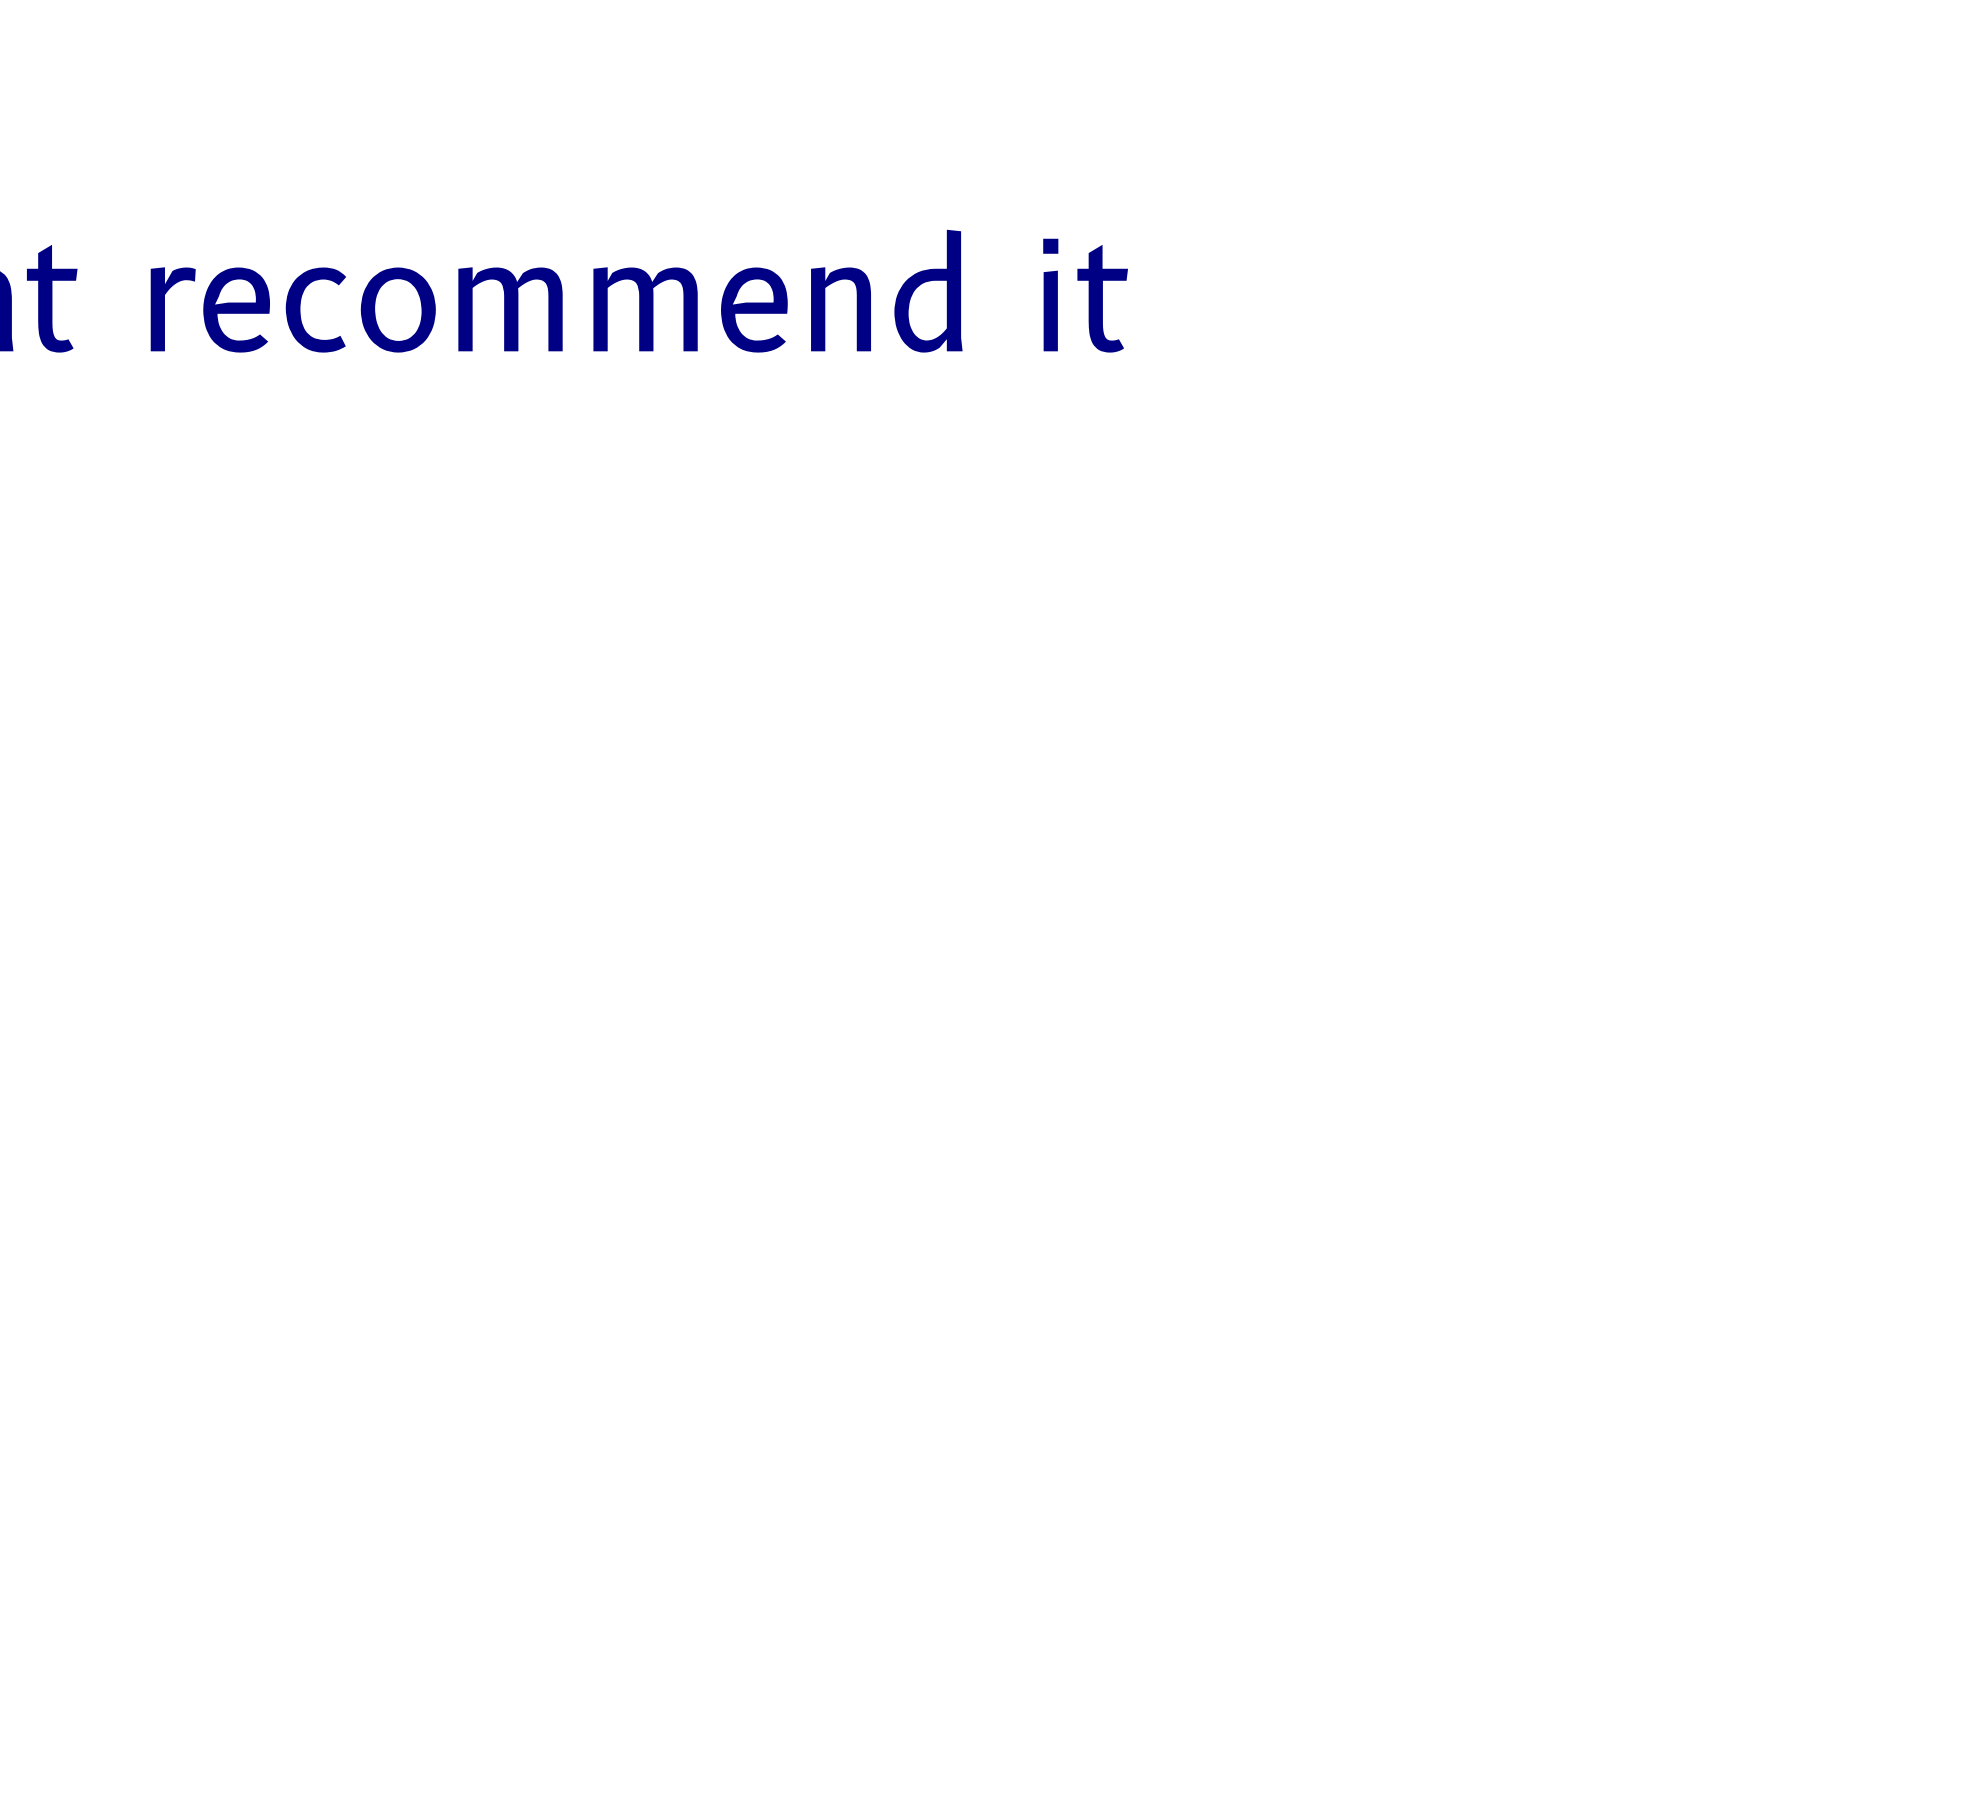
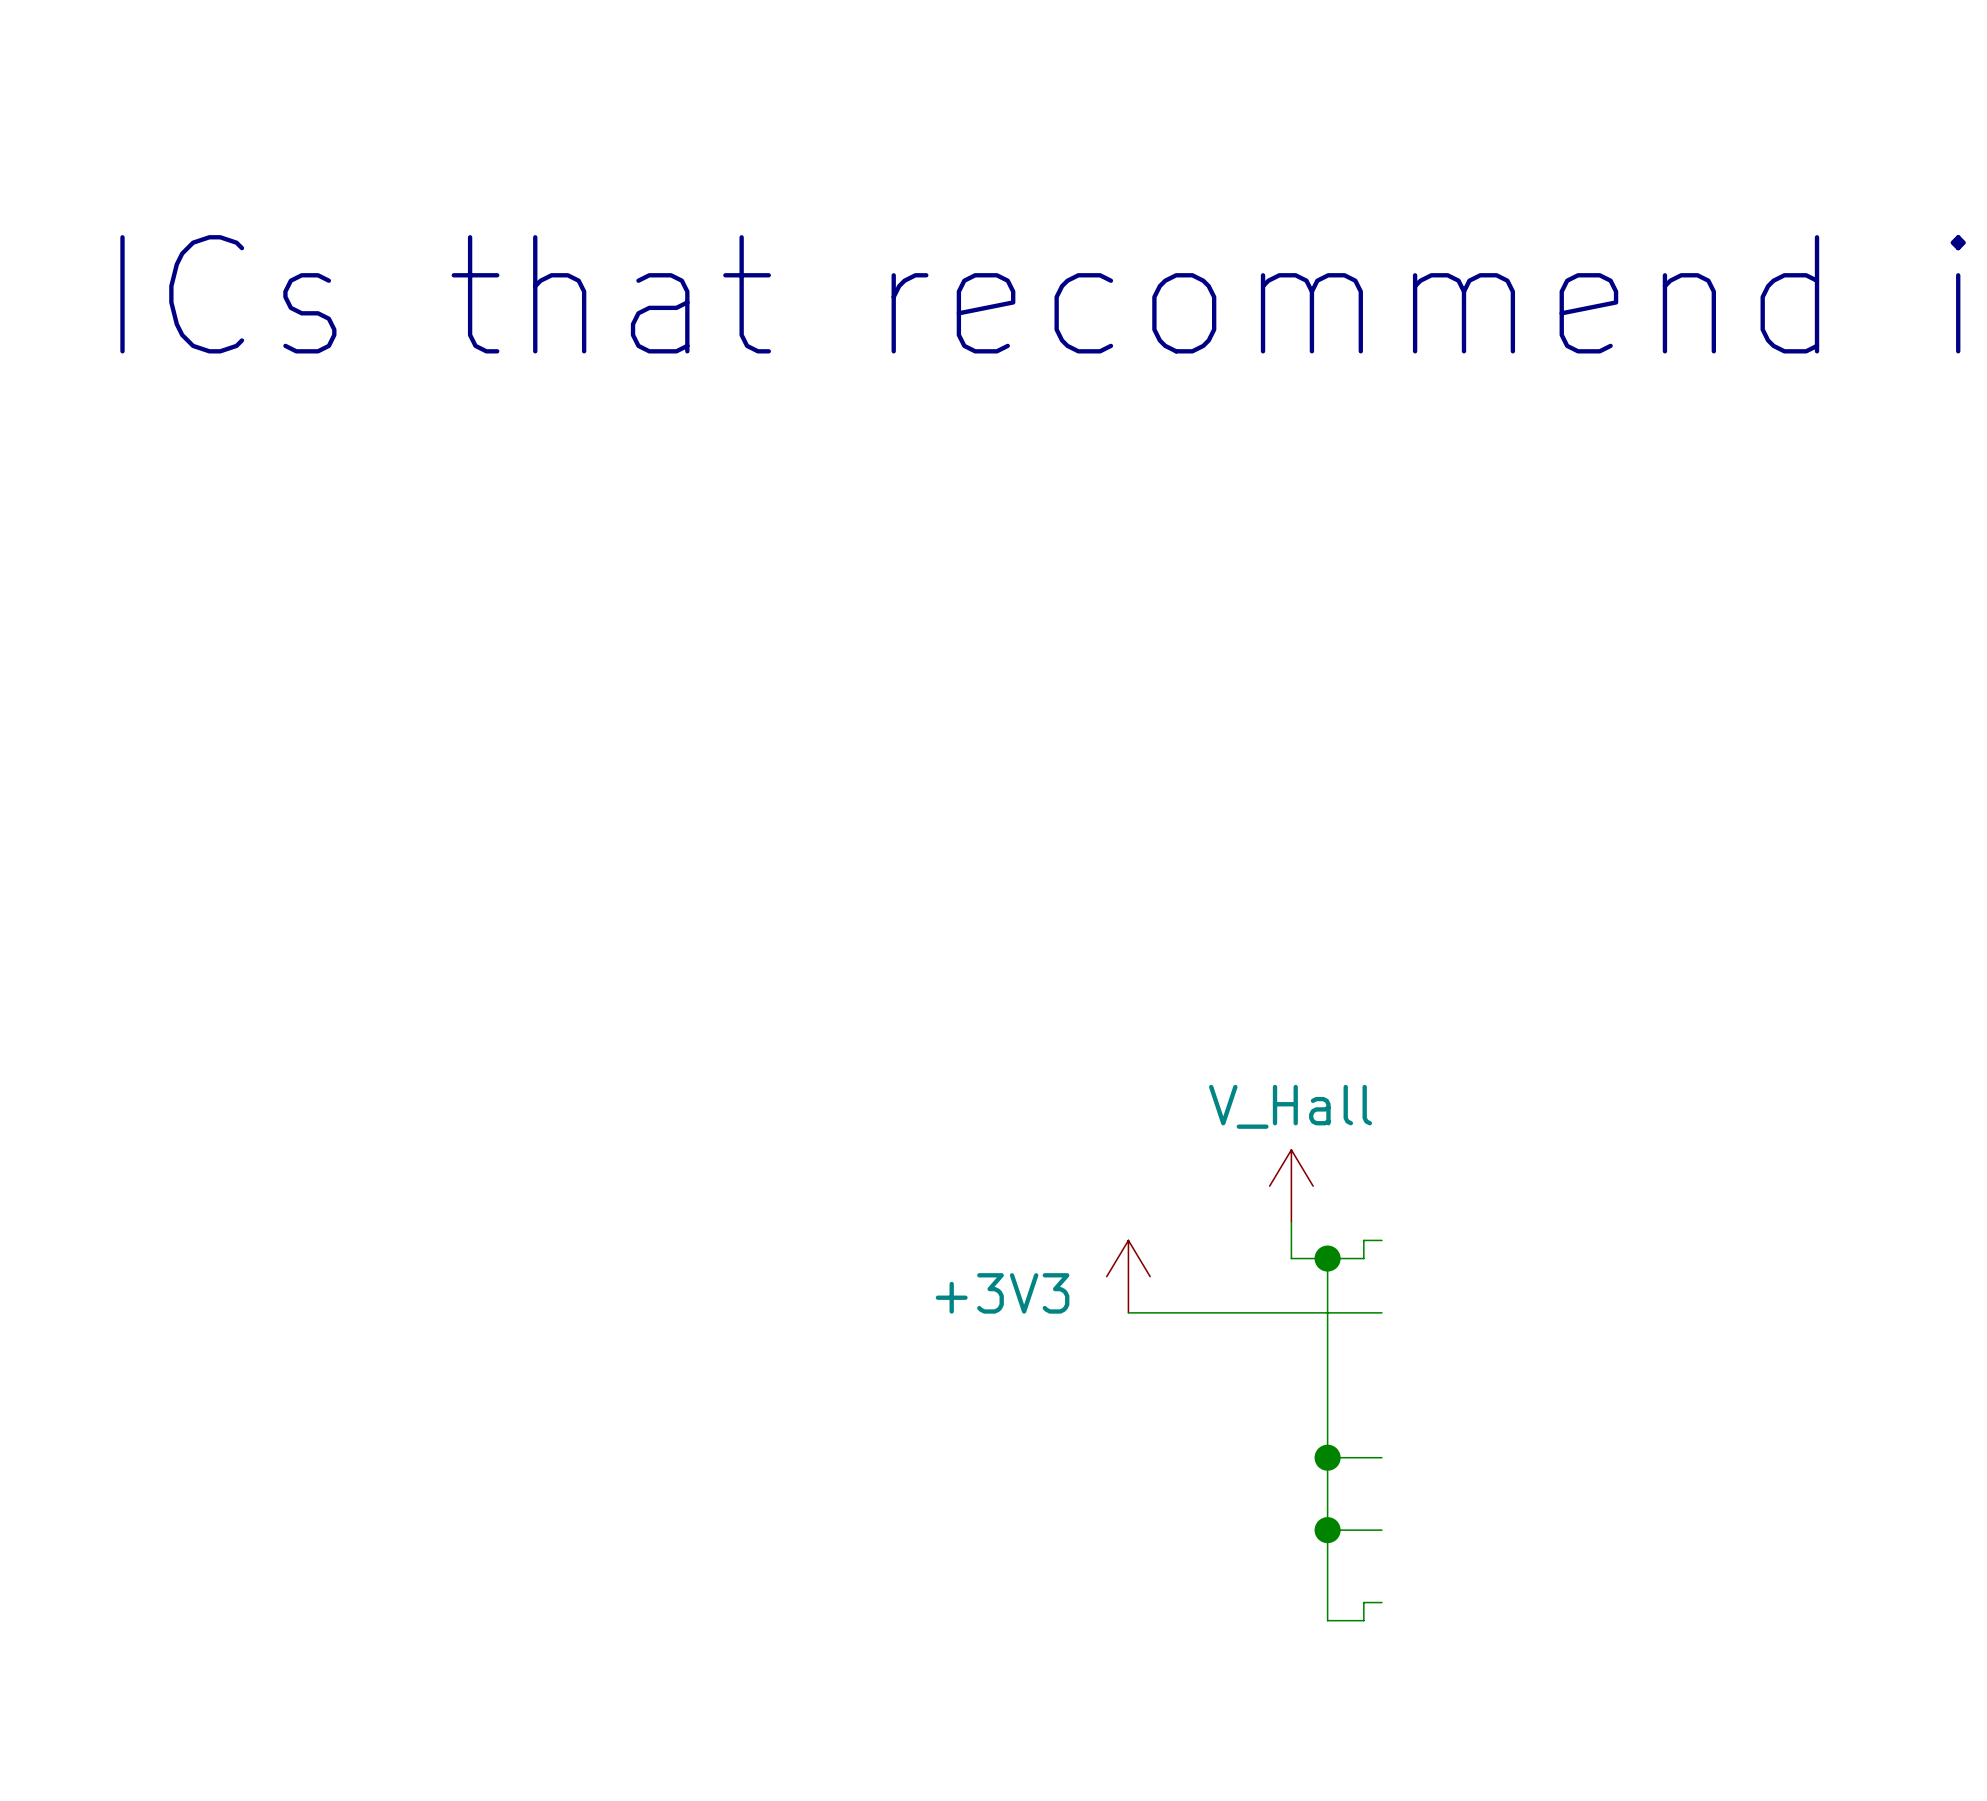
power symbol: none -> V_Hall (1291, 1186)
wire: none -> (1291, 1222) (1291, 1258) (1363, 1258) (1363, 1240) (1381, 1240)
wire: none -> (1327, 1258) (1327, 1620) (1363, 1620) (1363, 1602) (1381, 1602)
junction: none -> (1327, 1258)
power symbol: none -> +3V3 (1128, 1276)
wire: none -> (1128, 1312) (1381, 1312)
wire: none -> (1327, 1457) (1381, 1457)
junction: none -> (1327, 1457)
wire: none -> (1327, 1530) (1381, 1530)
junction: none -> (1327, 1530)

